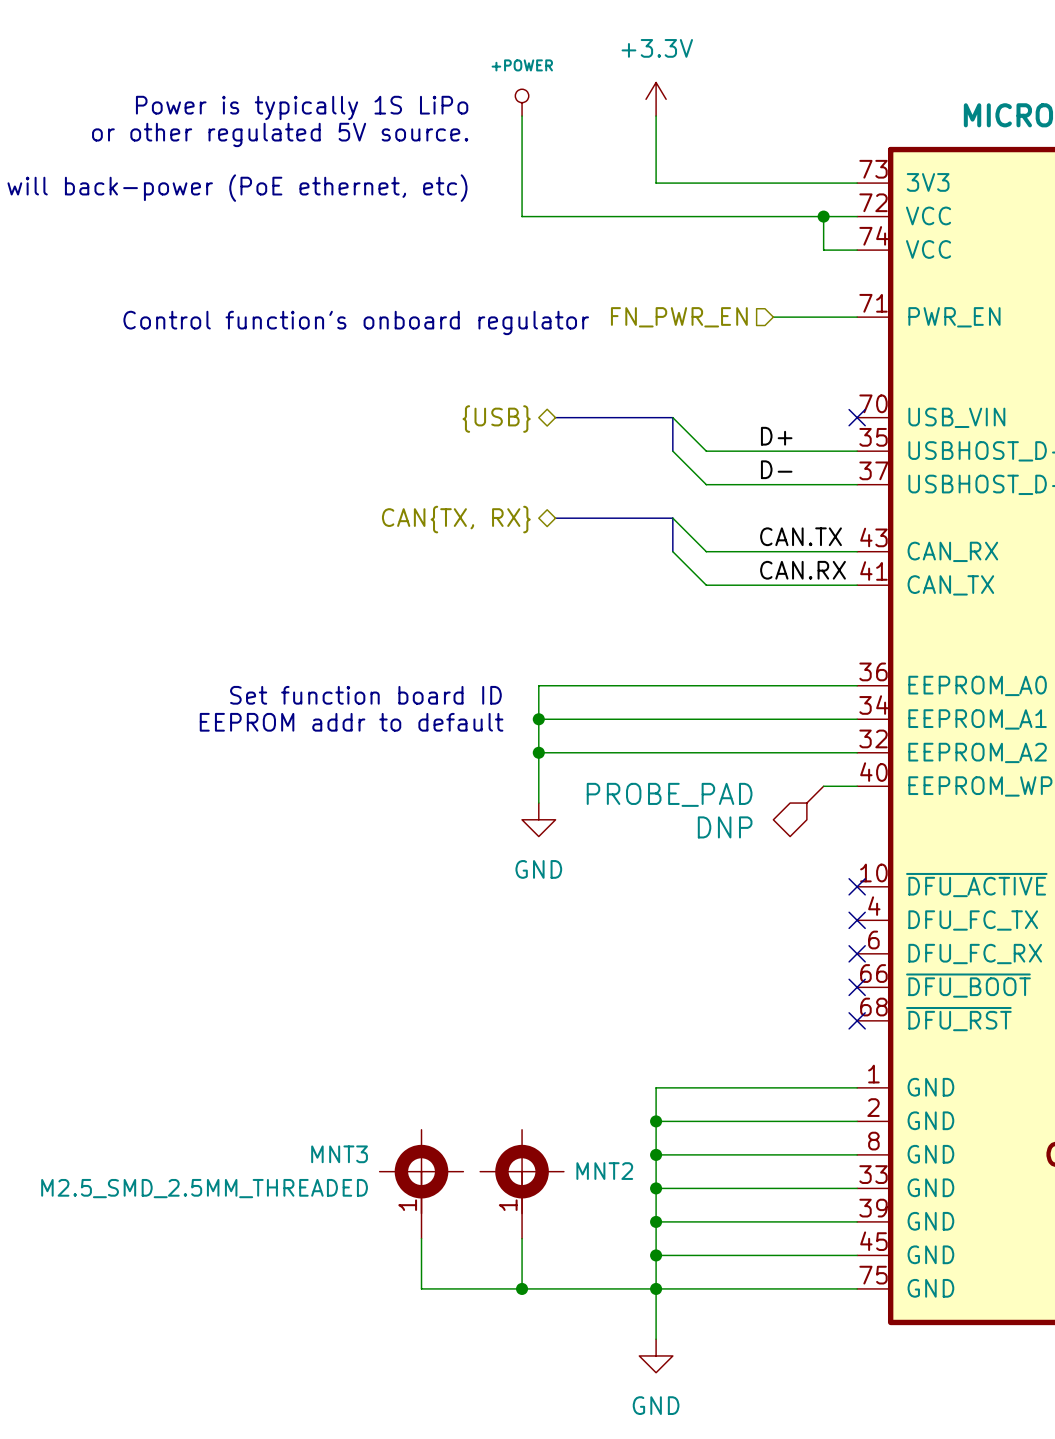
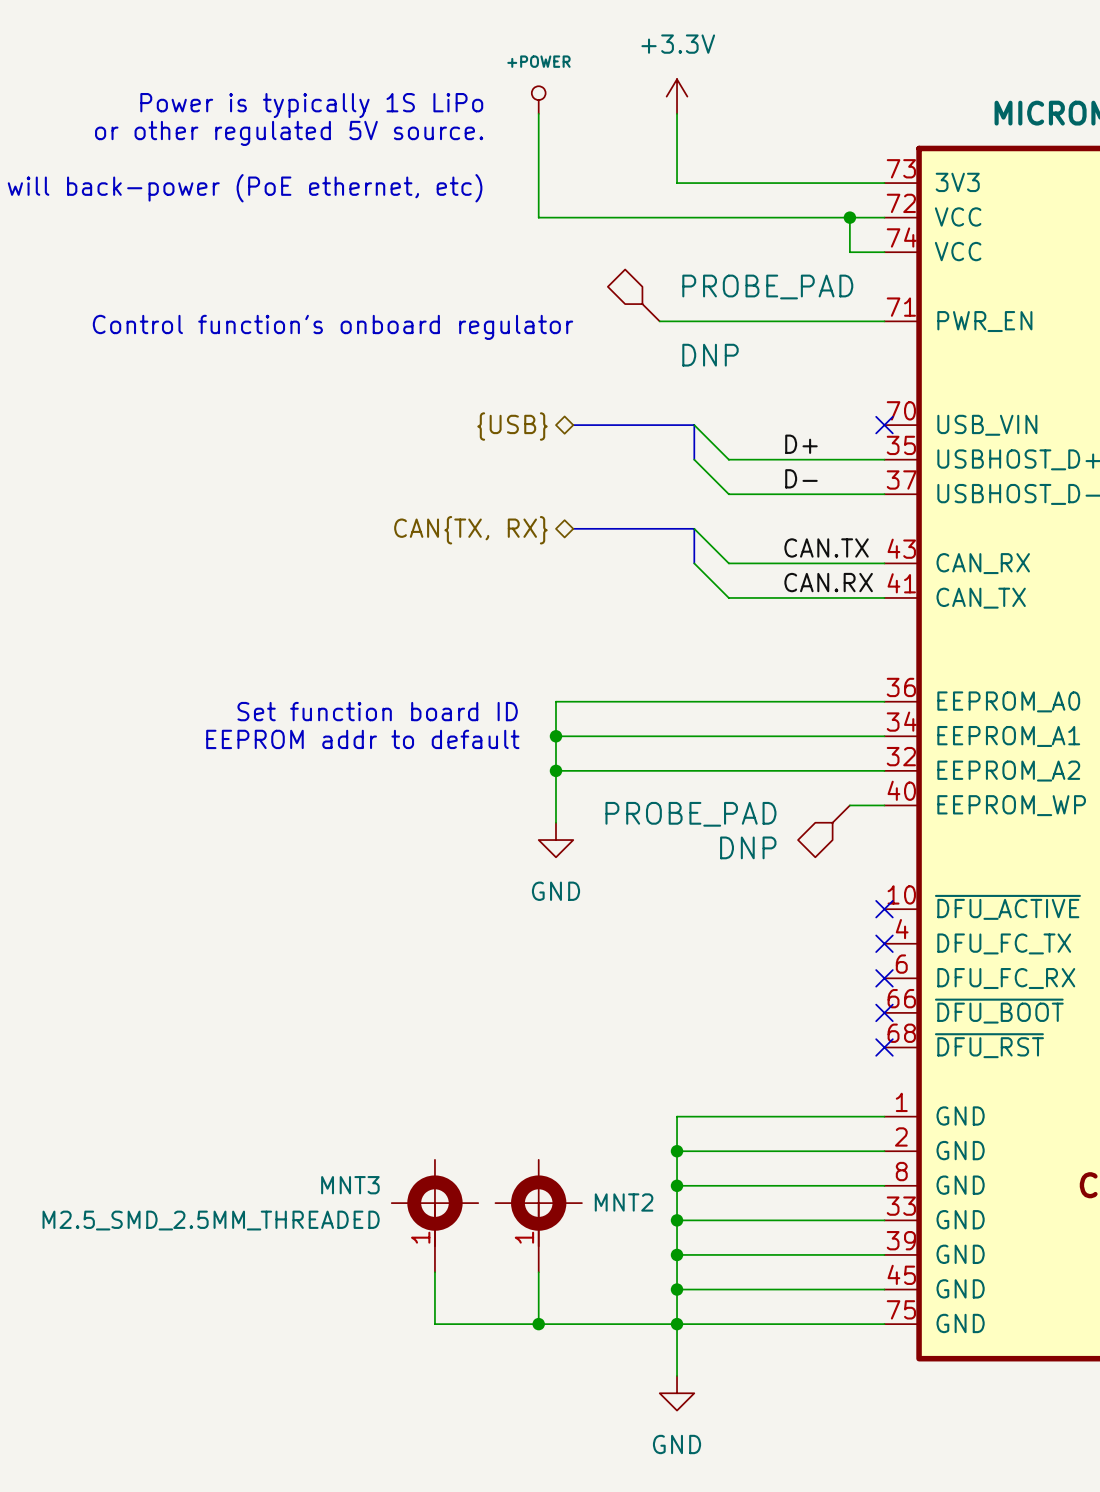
part: none -> PROBE_PAD (633, 295)
wire: none -> (659, 321) (798, 321)
hierarchical label: FN_PWR_EN (679, 317) -> none
text position: Control function's onboard regulator (356, 322) -> Control function's onboard regulator (333, 327)

